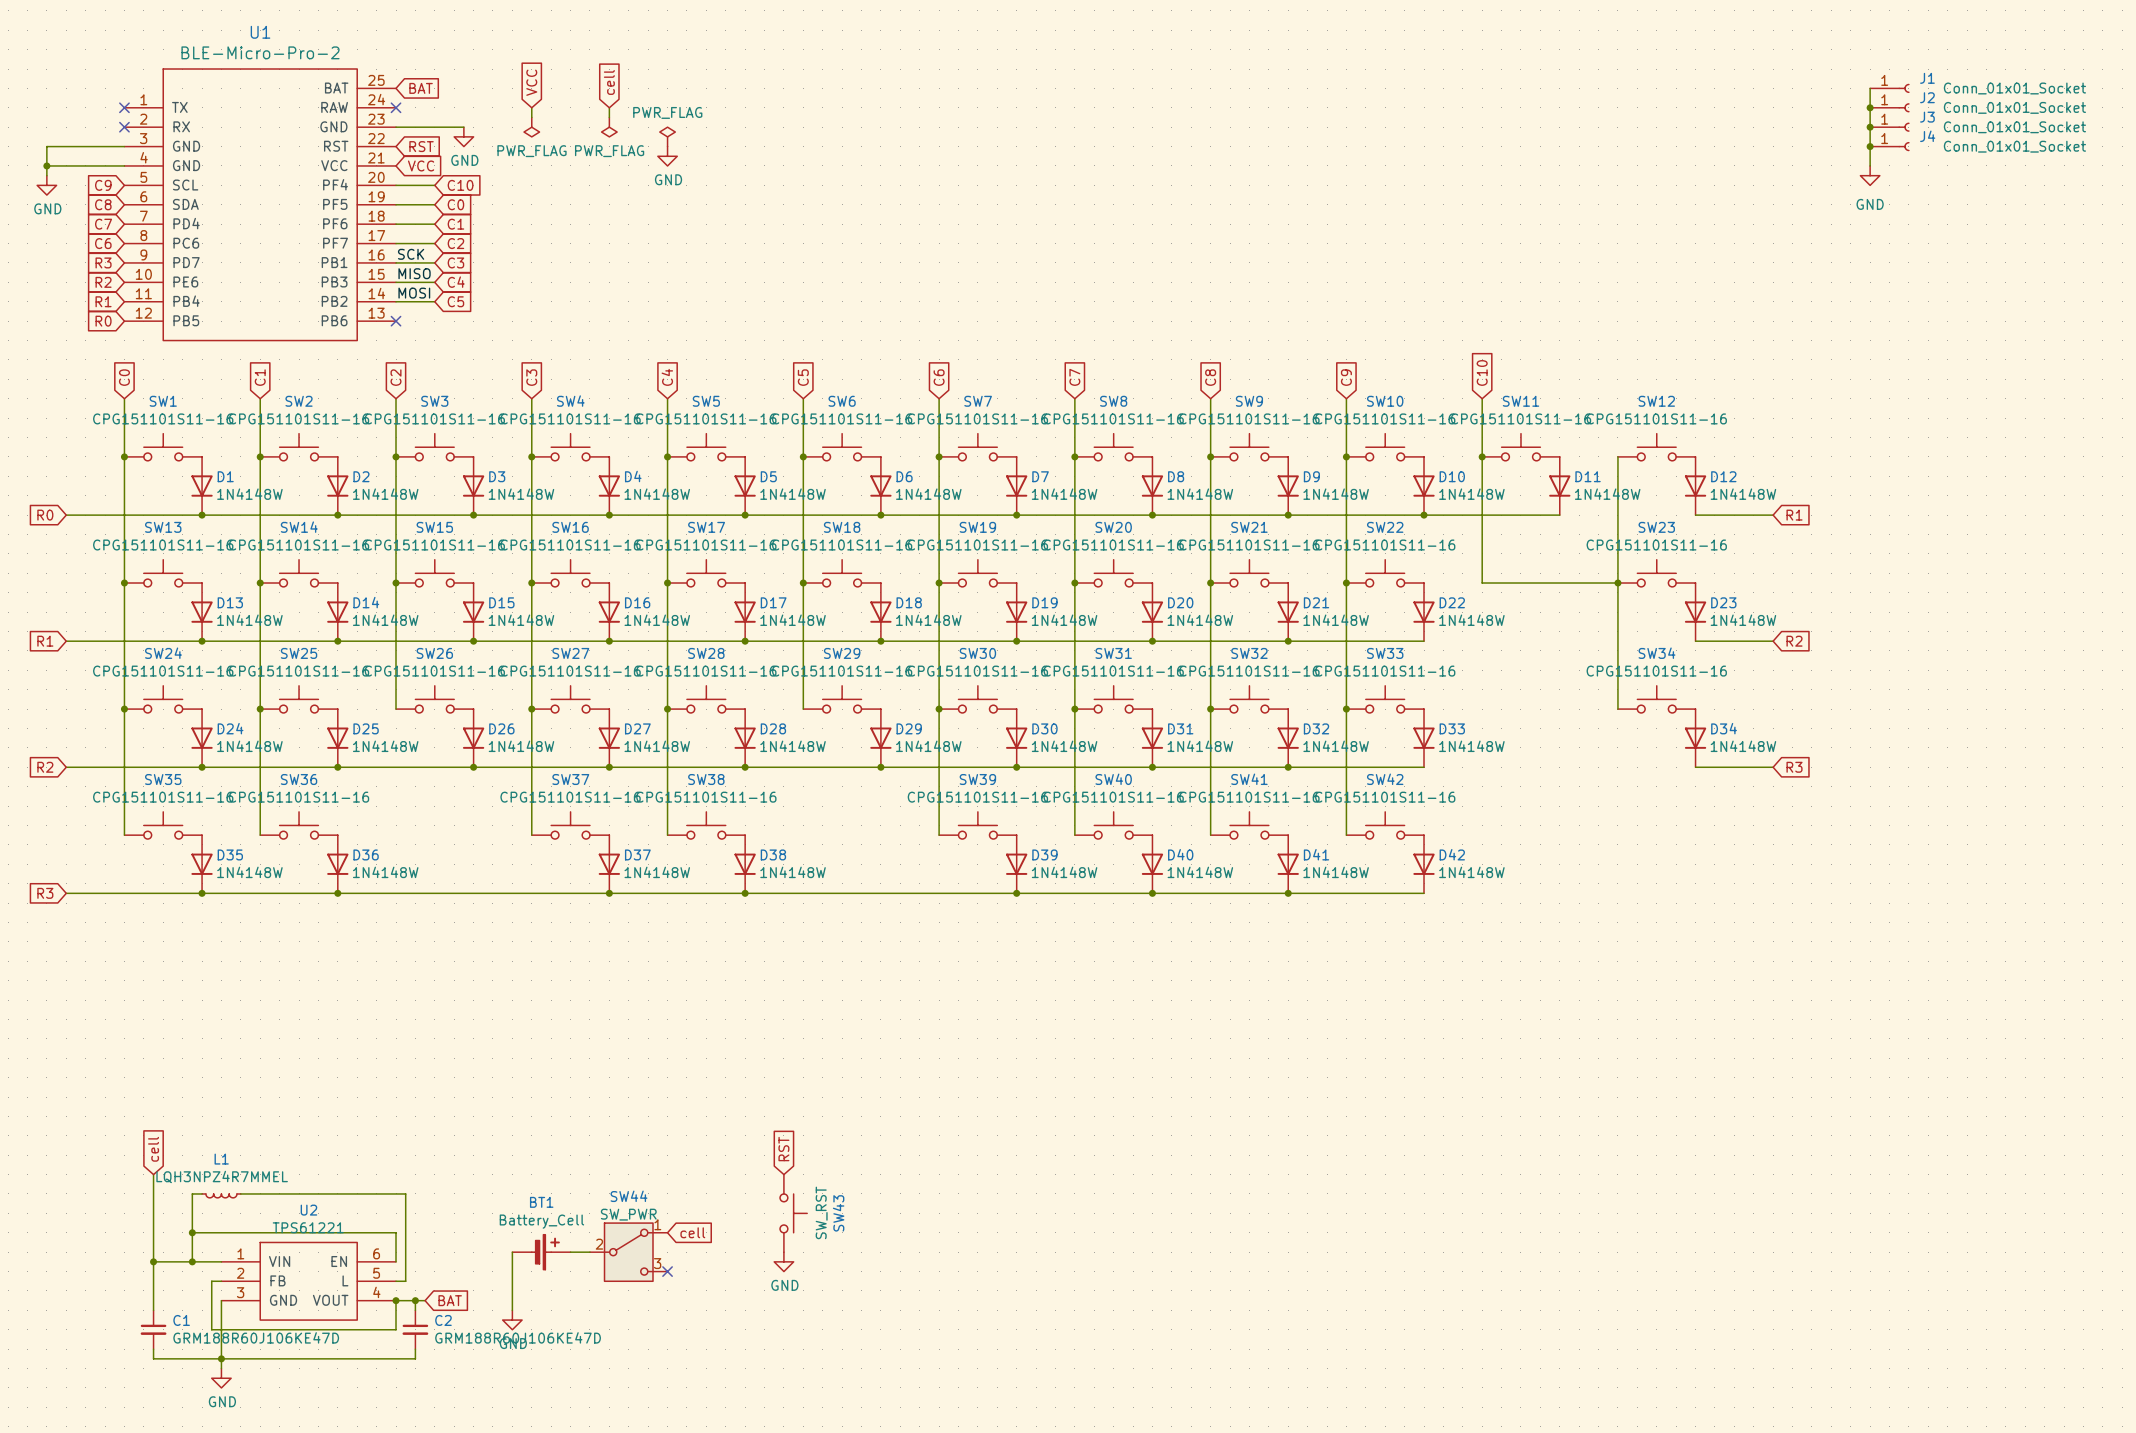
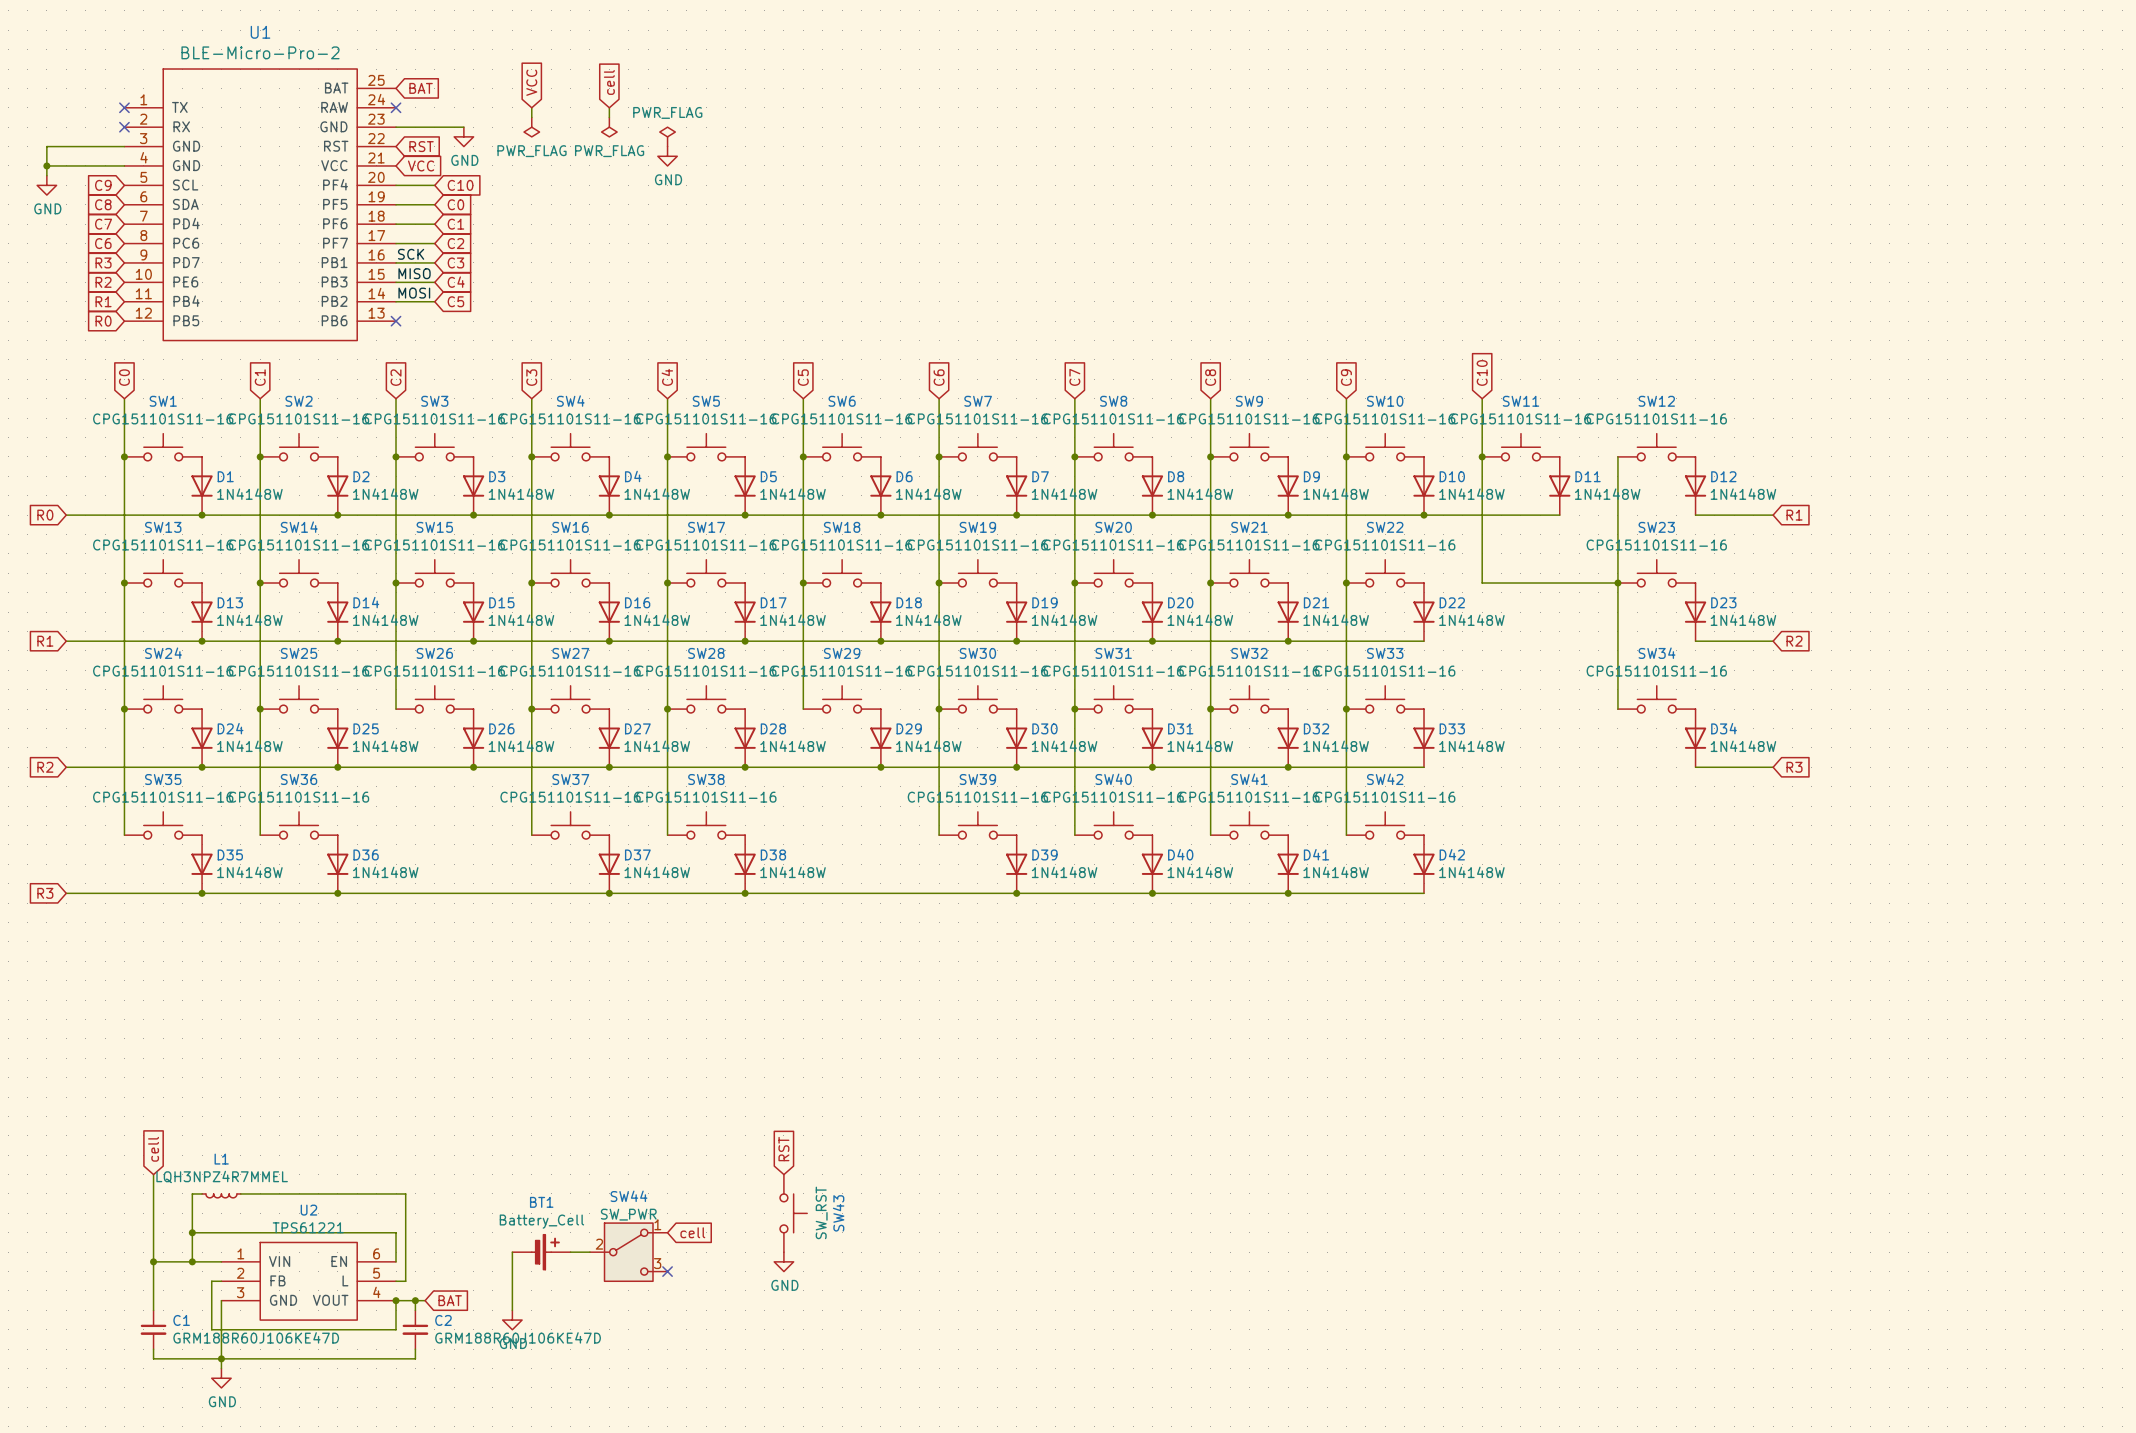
wire: (1870, 88) (1870, 165) -> none
J1: Conn_01x01_Socket (1889, 88) -> none
junction: (1870, 107) -> none
J2: Conn_01x01_Socket (1889, 107) -> none
junction: (1870, 127) -> none
J3: Conn_01x01_Socket (1889, 127) -> none
junction: (1870, 146) -> none
J4: Conn_01x01_Socket (1889, 146) -> none
power symbol: GND (1870, 175) -> none

